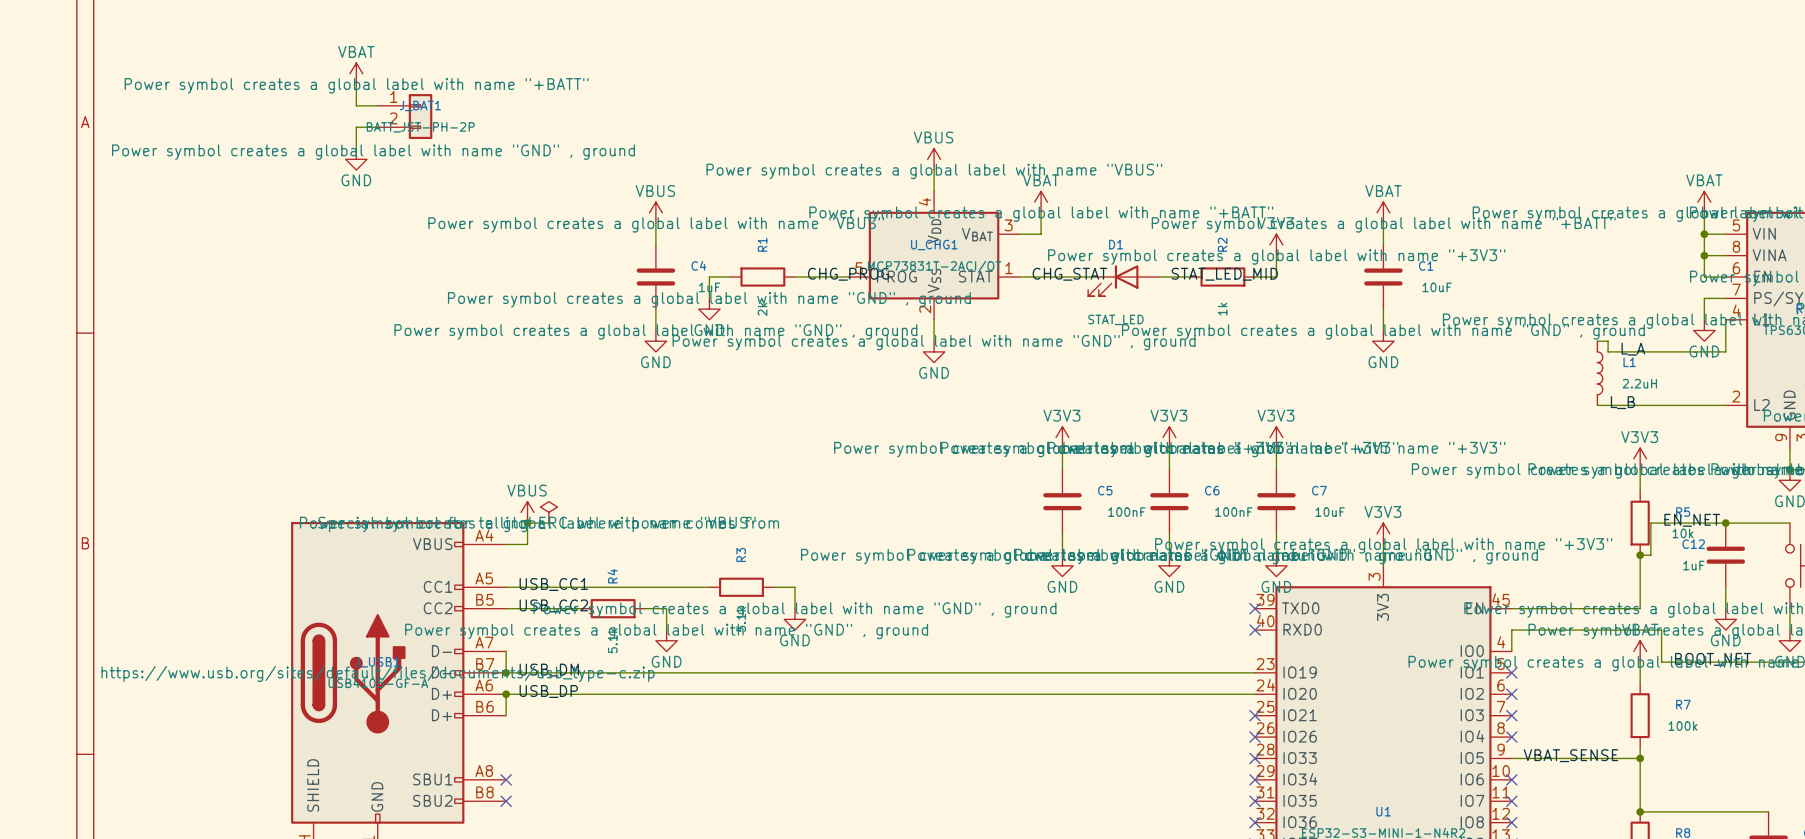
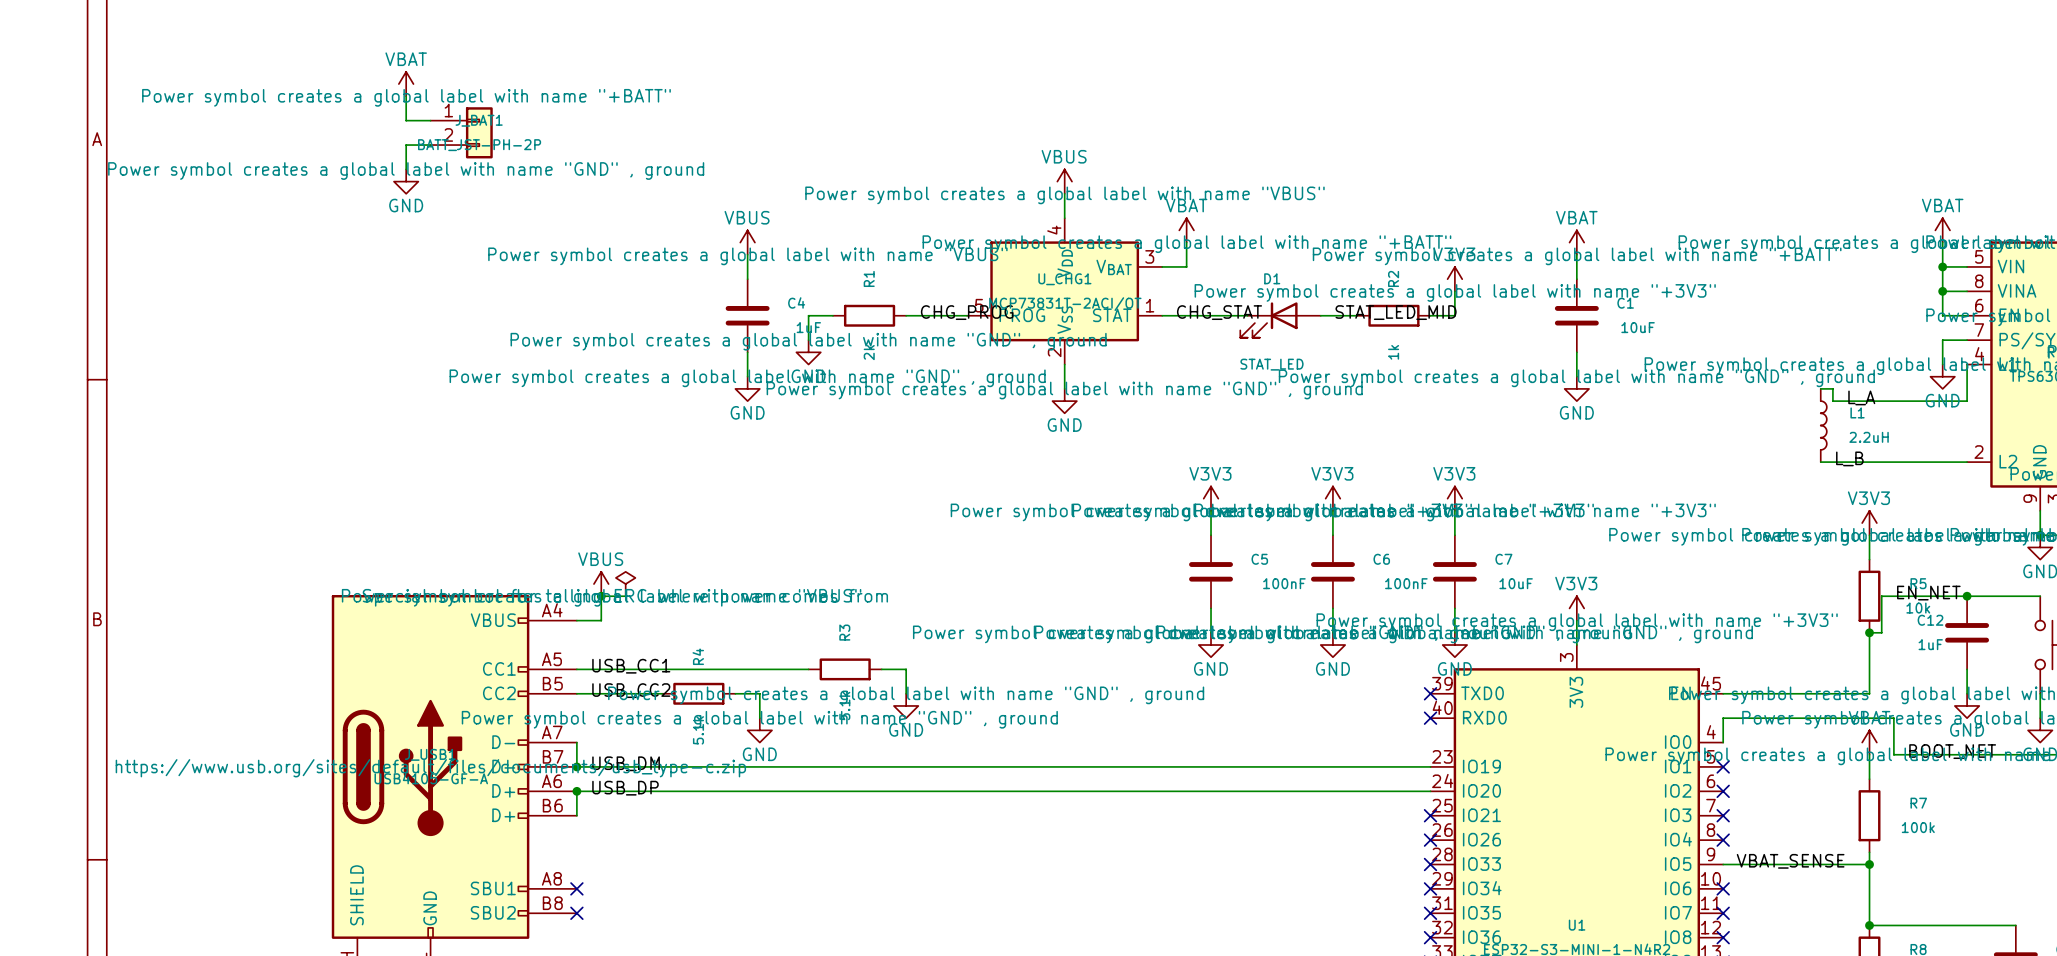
power symbol text position: Power symbol creates a global label with name "GND" , ground (373, 152) -> Power symbol creates a global label with name "GND" , ground (406, 170)

